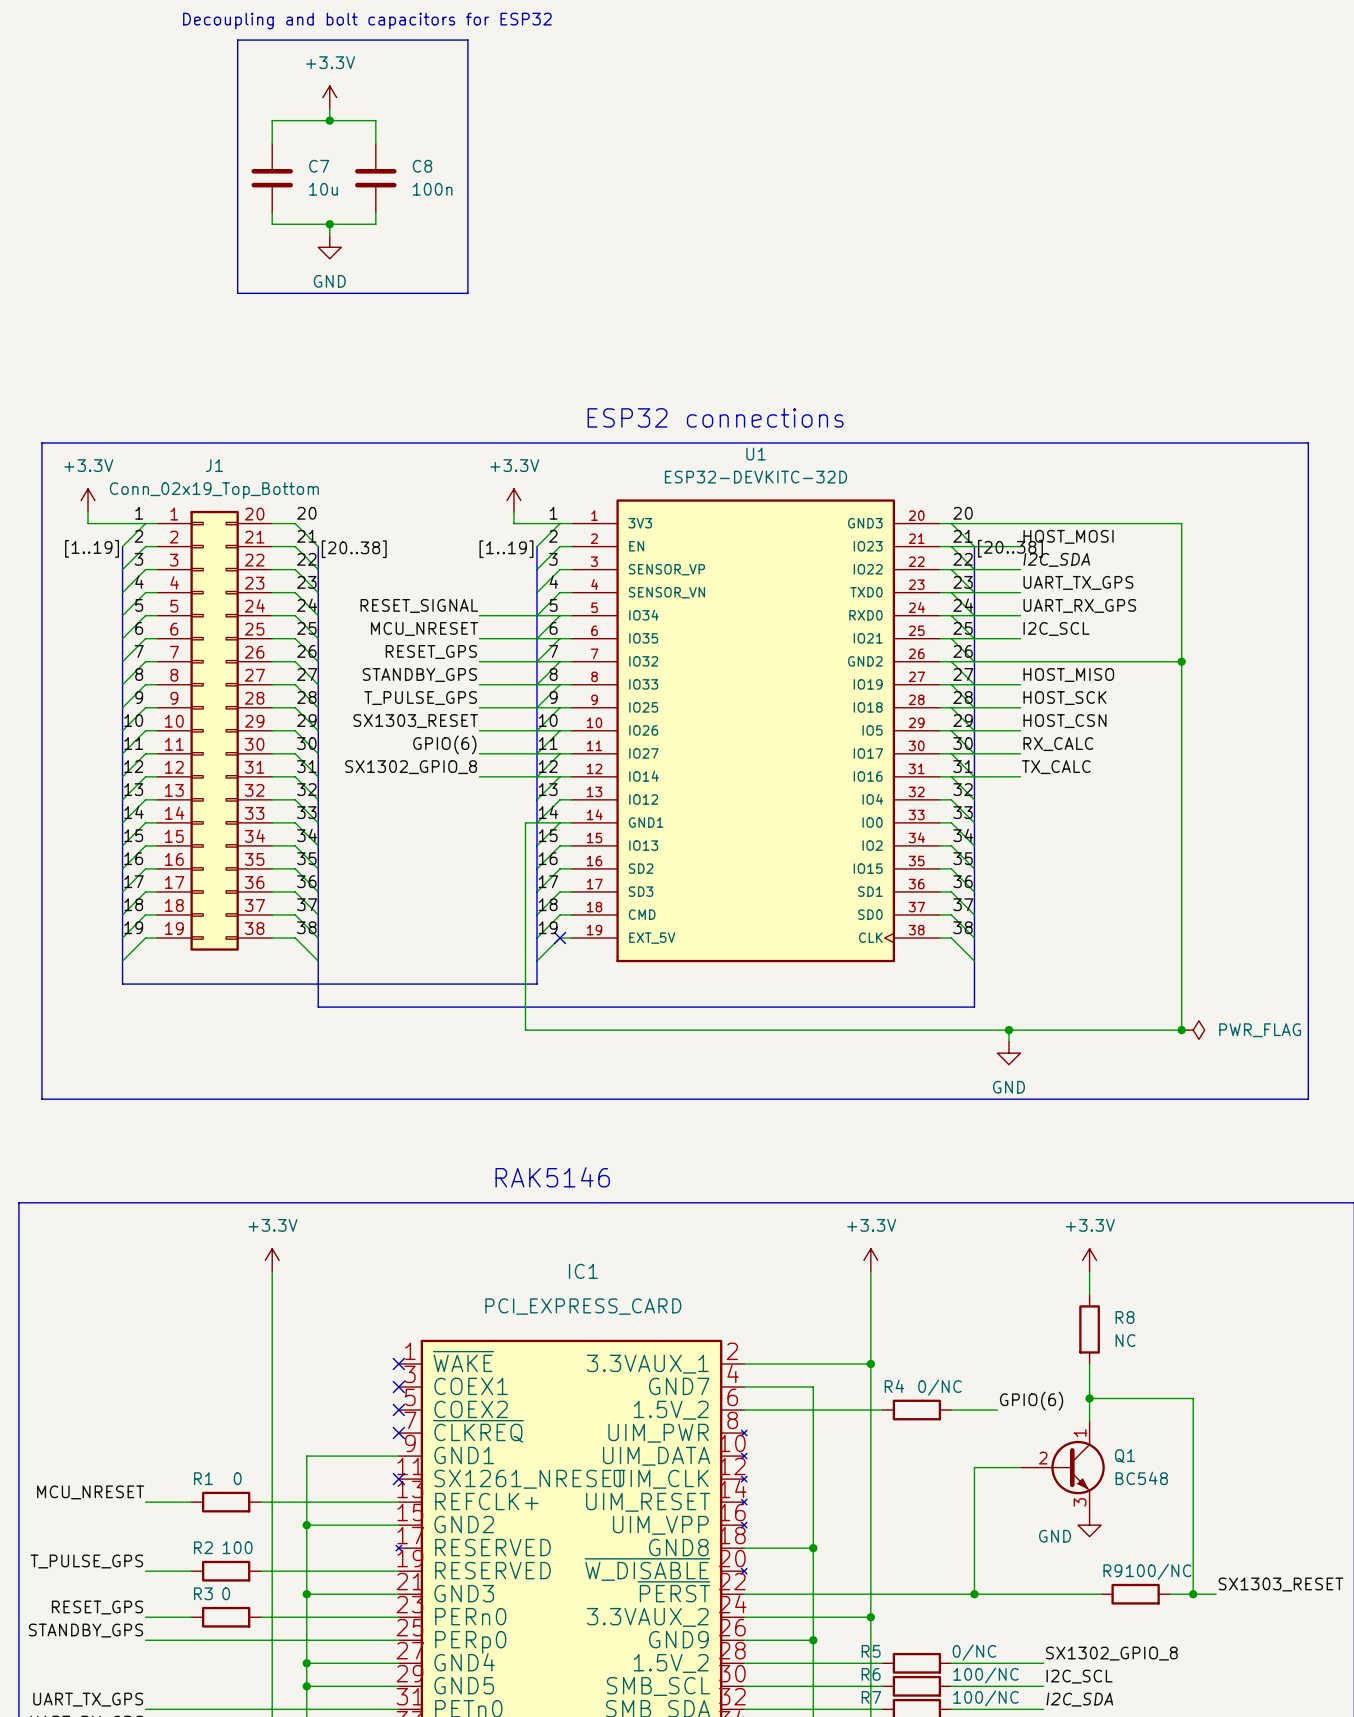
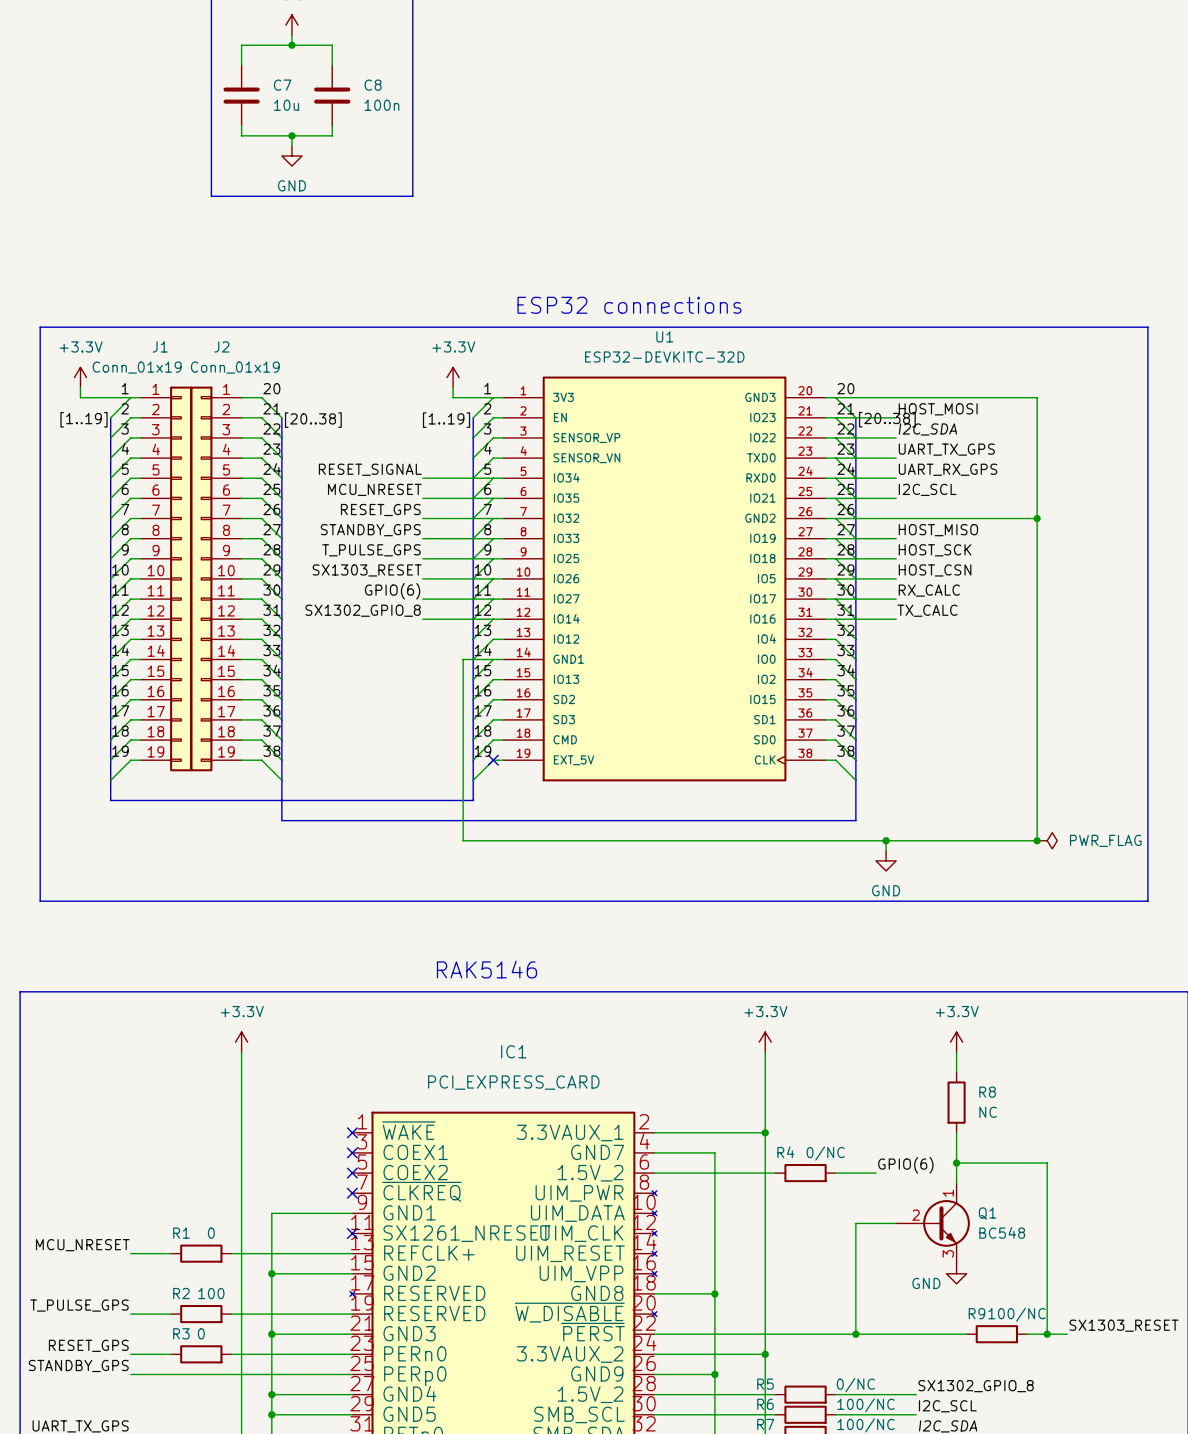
J1 value: Conn_02x19_Top_Bottom (214, 490) -> Conn_01x19 (137, 367)
J1 symbol: [157, 510, 273, 951] -> [140, 386, 193, 772]
J2: none -> Conn_01x19 (215, 578)

